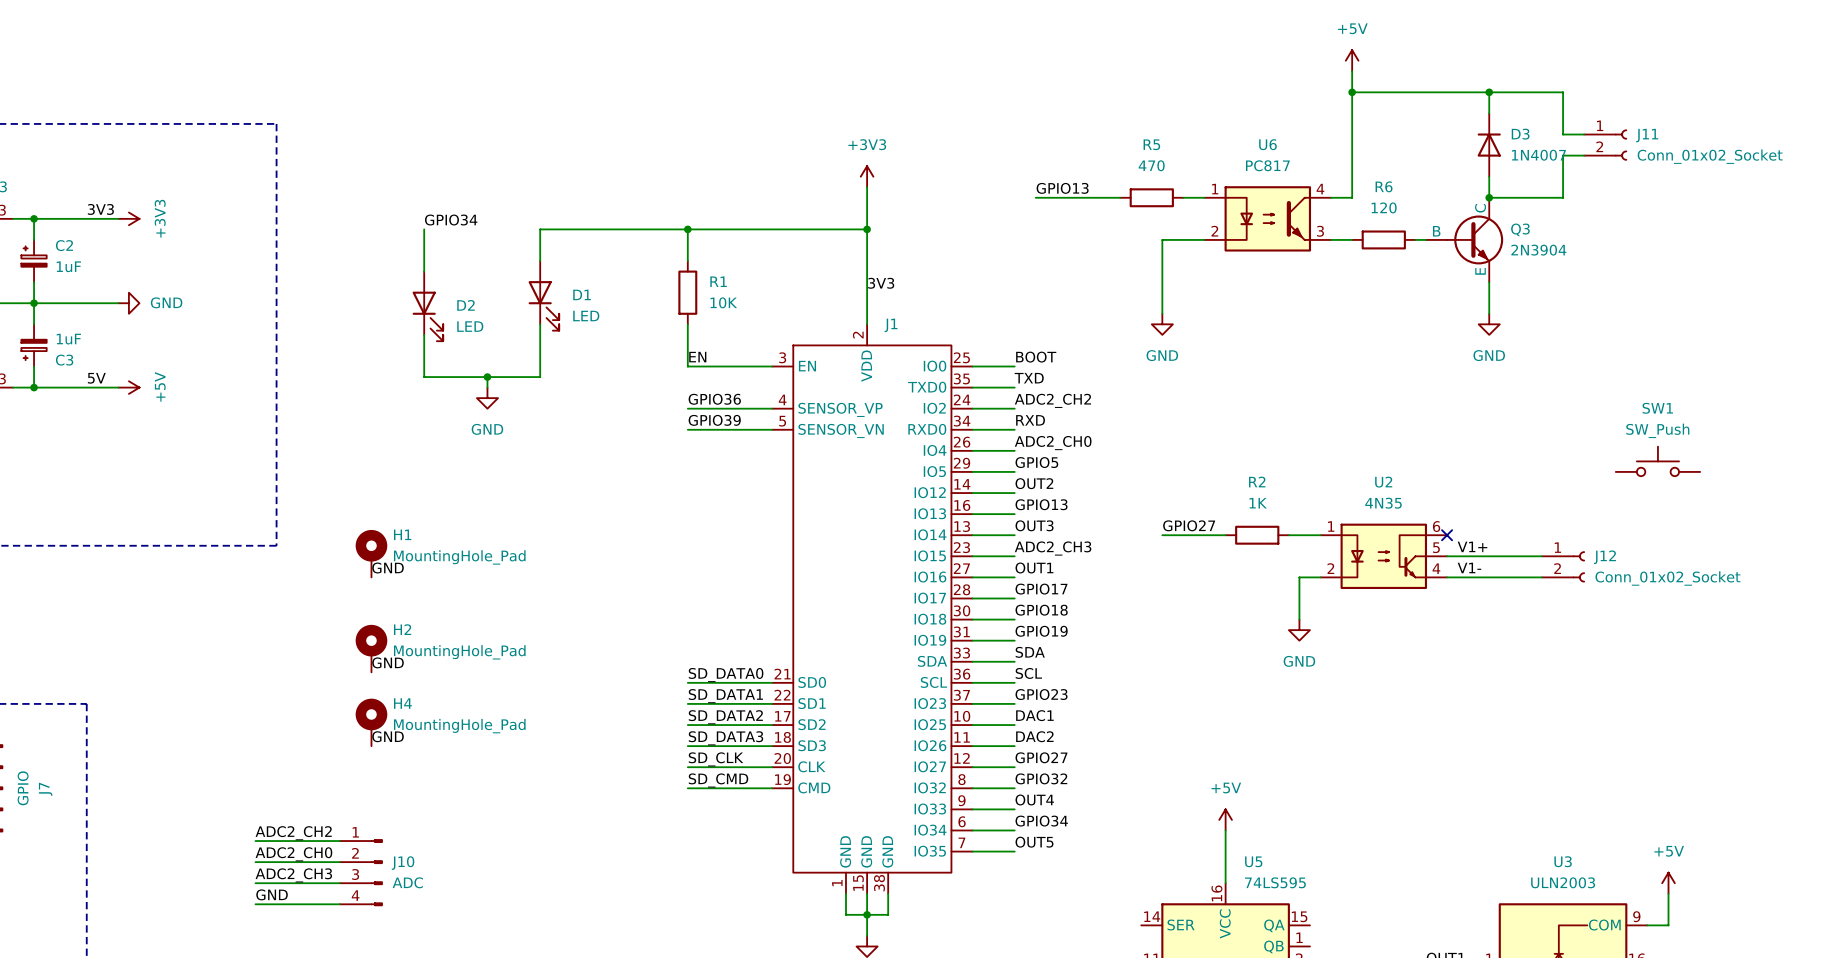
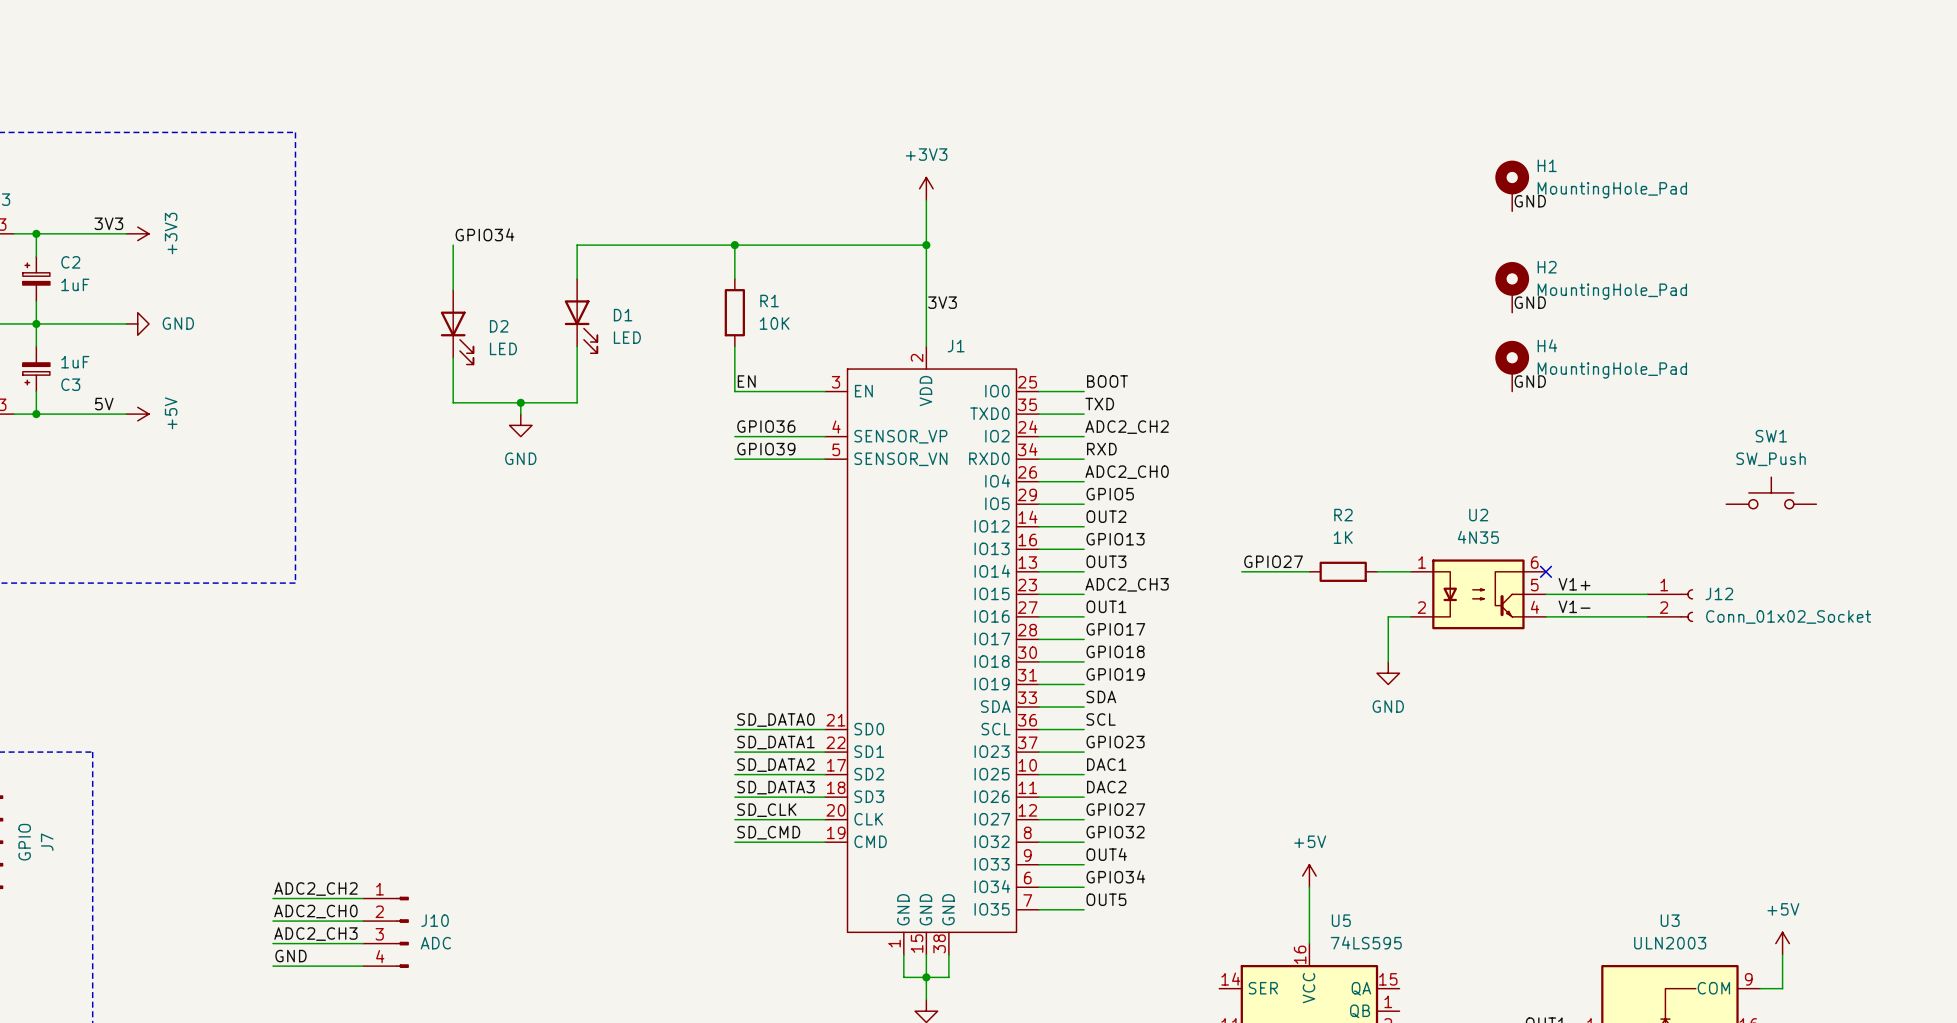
power symbol: +5V (1352, 60) -> none
wire: (1352, 71) (1352, 197) (1331, 197) -> none
wire: (1352, 92) (1563, 92) (1563, 134) (1584, 134) -> none
junction: (1352, 92) -> none
wire: (1489, 92) (1489, 113) -> none
junction: (1489, 92) -> none
D3: 1N4007 (1489, 145) -> none
J11: Conn_01x02_Socket (1605, 145) -> none
wire: (1584, 155) (1563, 155) (1563, 197) (1489, 197) (1489, 176) -> none
label: GPIO13 (1062, 188) -> none
label: none -> GND (1530, 201)
wire: (1035, 197) (1120, 197) -> none
R5: 470 (1151, 197) -> none
wire: (1183, 197) (1204, 197) -> none
junction: (1489, 197) -> none
U6: PC817 (1267, 218) -> none
wire: (1204, 239) (1162, 239) (1162, 313) -> none
wire: (1331, 239) (1352, 239) -> none
R6: 120 (1383, 239) -> none
wire: (1415, 239) (1425, 239) -> none
Q3: 2N3904 (1464, 239) -> none
wire: (1489, 282) (1489, 313) -> none
label: none -> GND (1530, 302)
power symbol: GND (1162, 324) -> none
power symbol: GND (1489, 324) -> none
label: none -> GND (1530, 381)
H1 position: (371, 553) -> (1512, 185)
label: GND (388, 568) -> none
H2 position: (371, 648) -> (1512, 287)
label: GND (388, 662) -> none
H4 position: (371, 722) -> (1512, 366)
label: GND (388, 736) -> none

